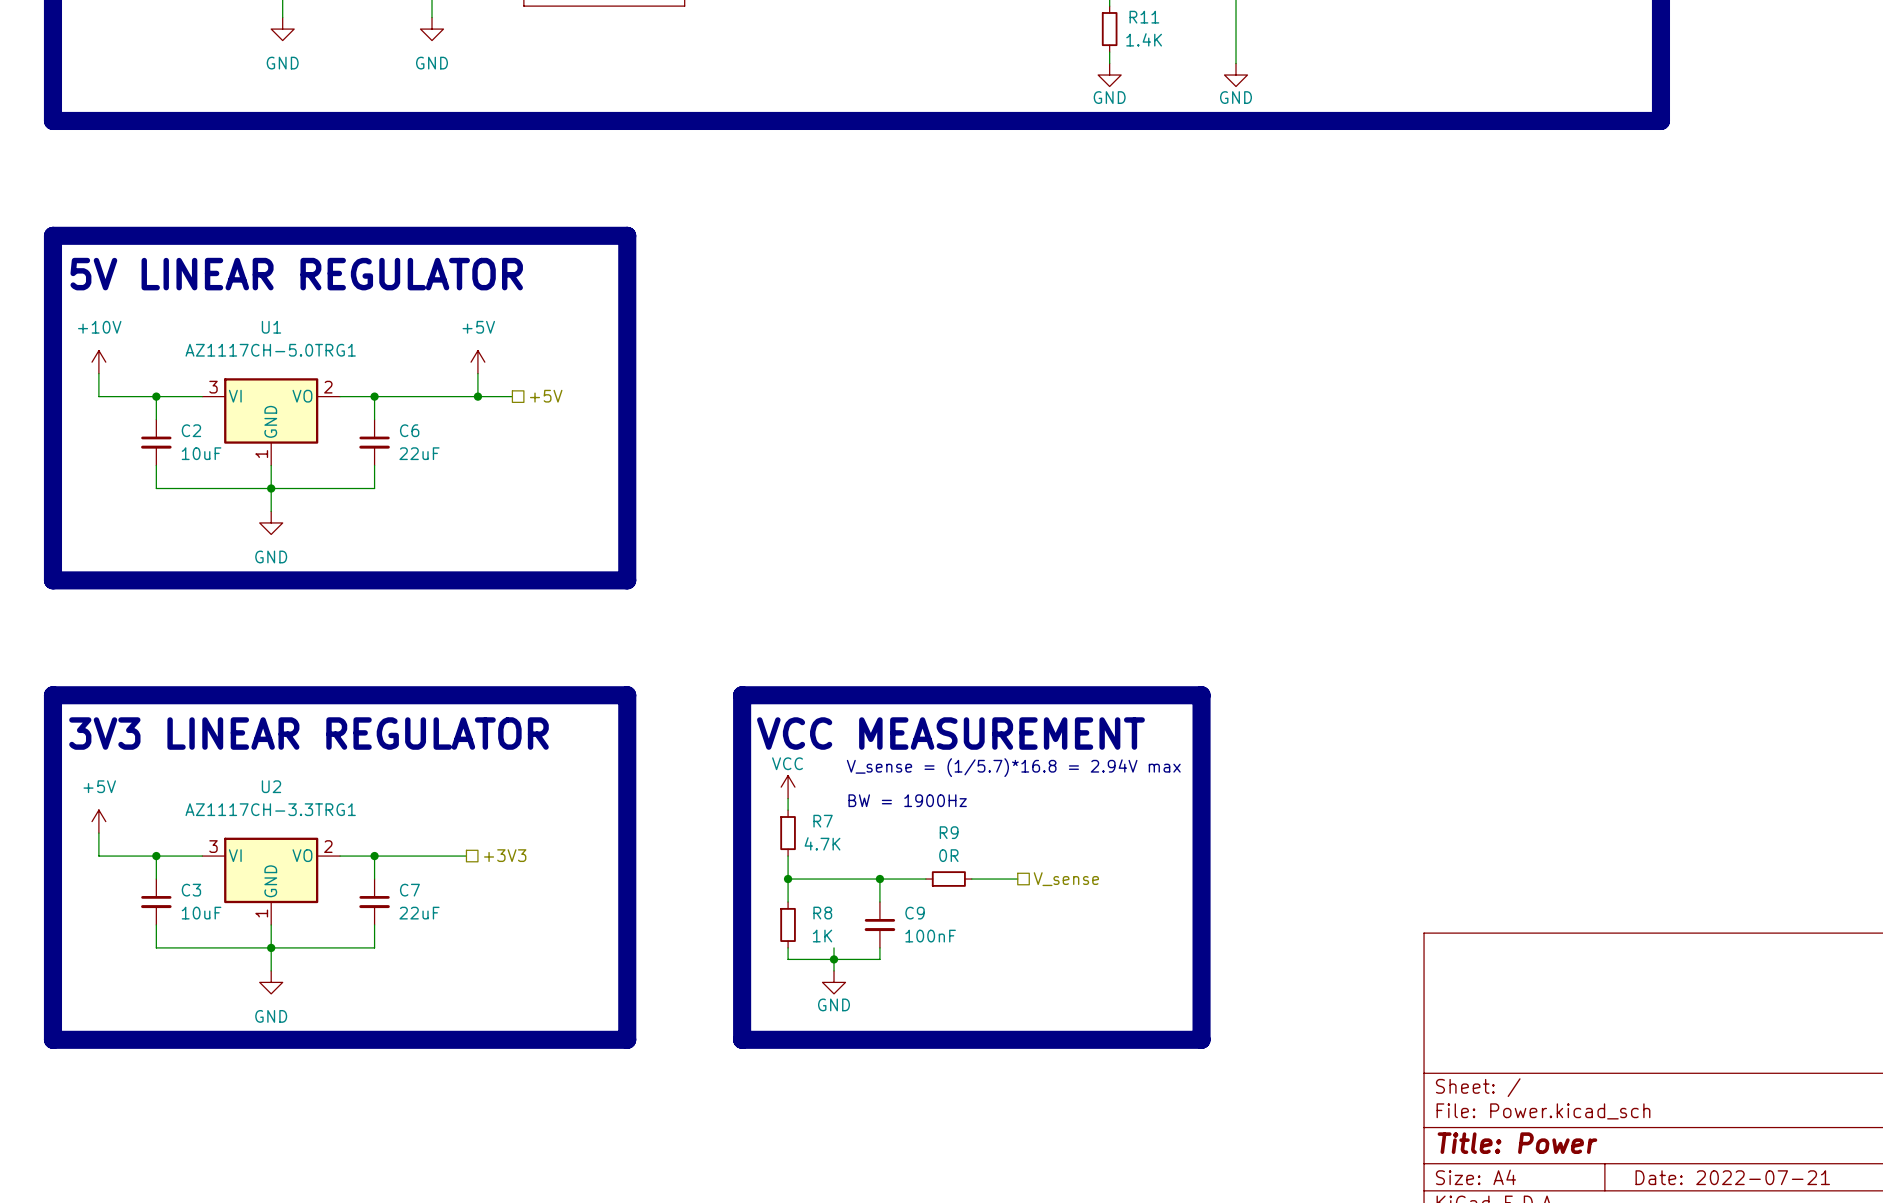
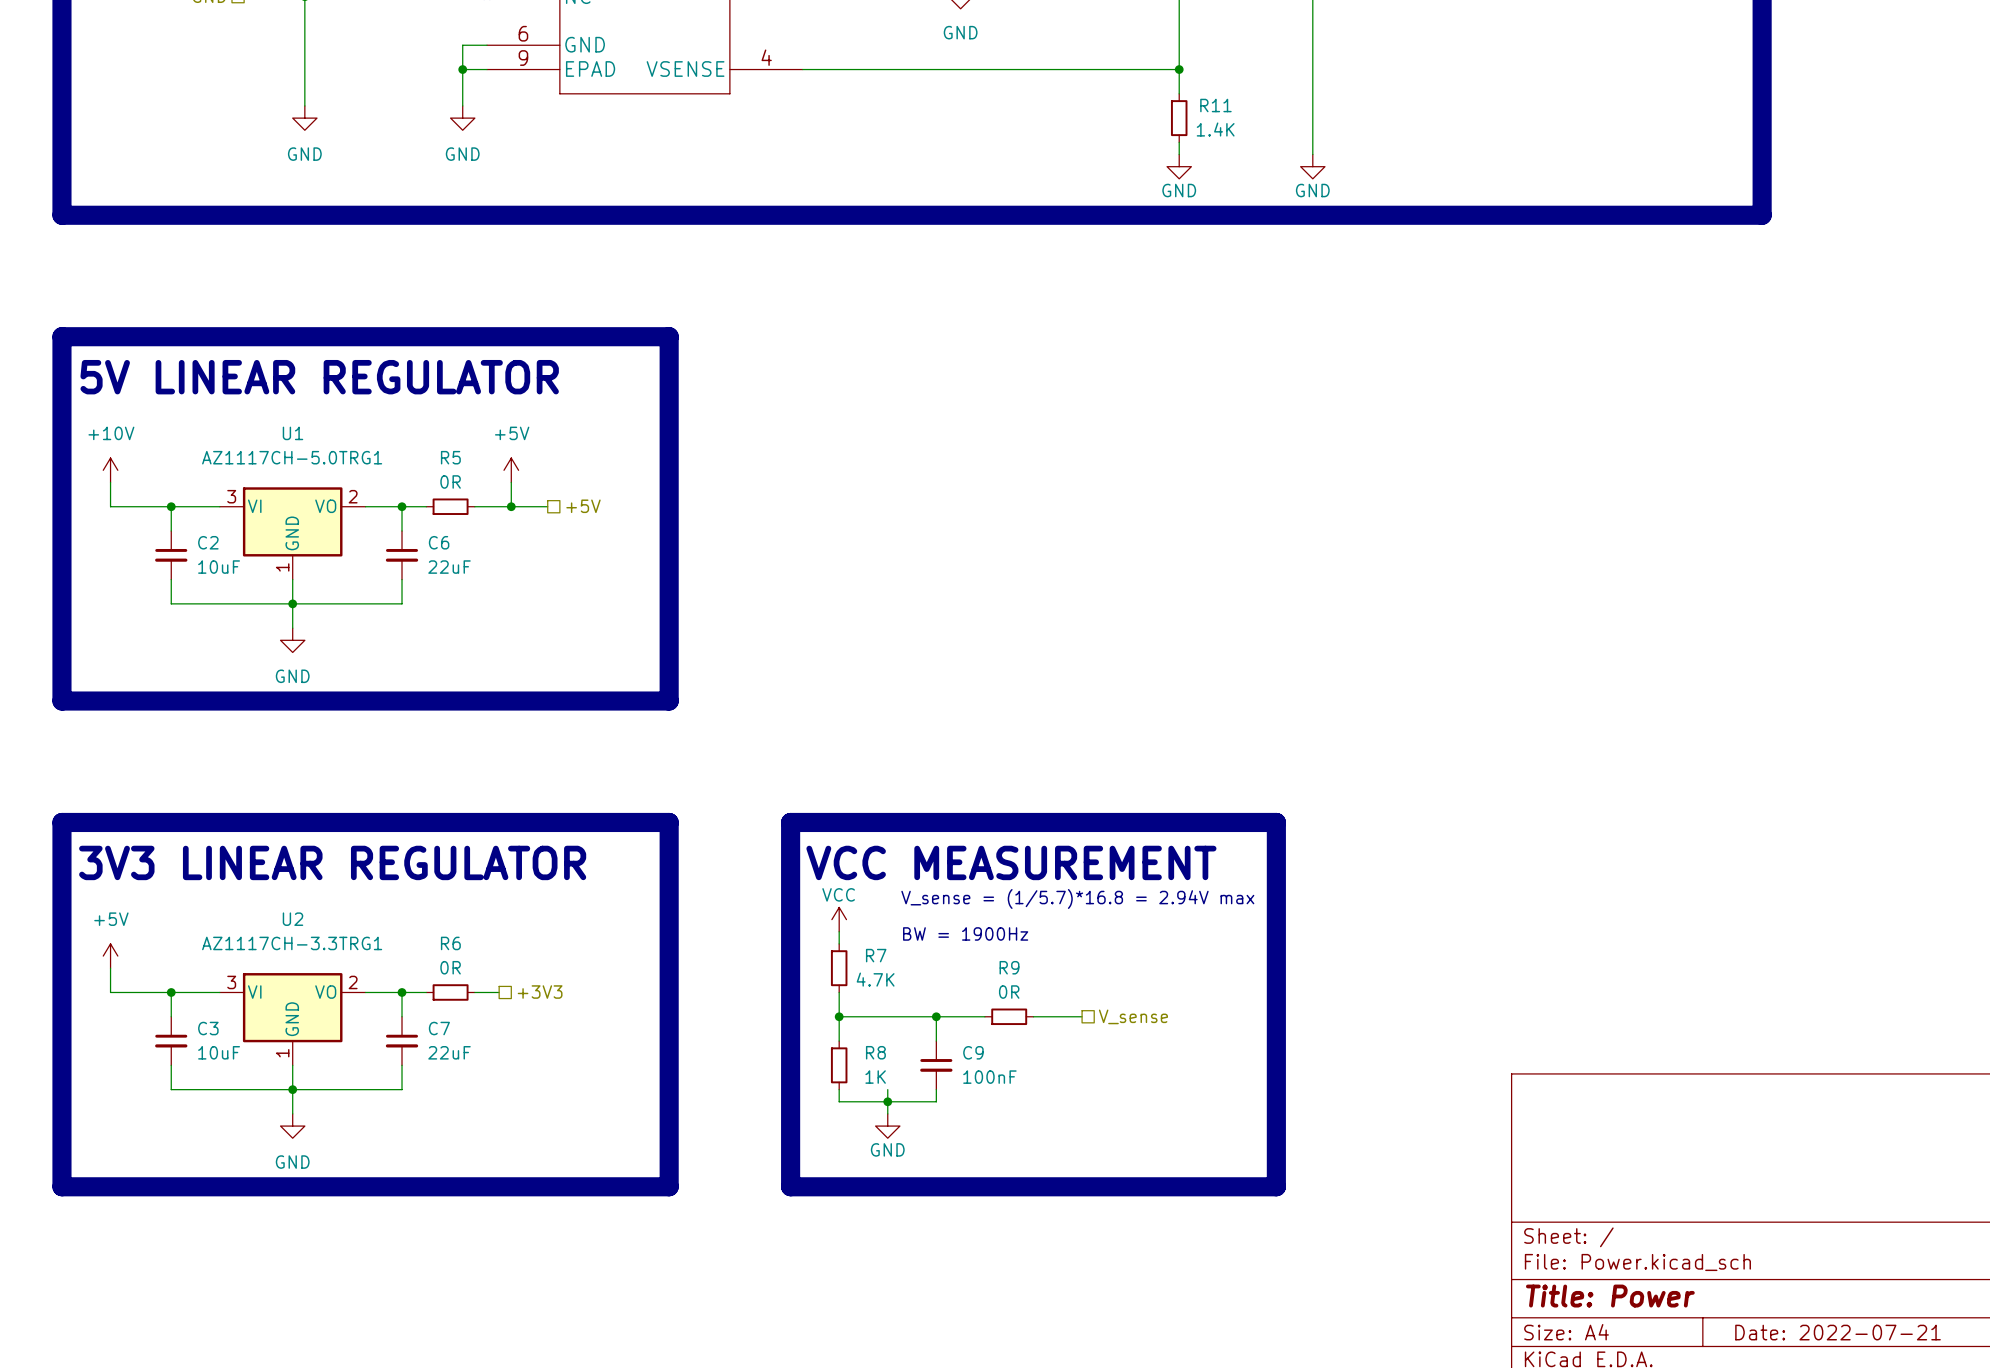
wire: (397, 396) (443, 396) -> none
R5: none -> 0R (450, 506)
wire: (397, 856) (443, 856) -> none
R6: none -> 0R (450, 992)

